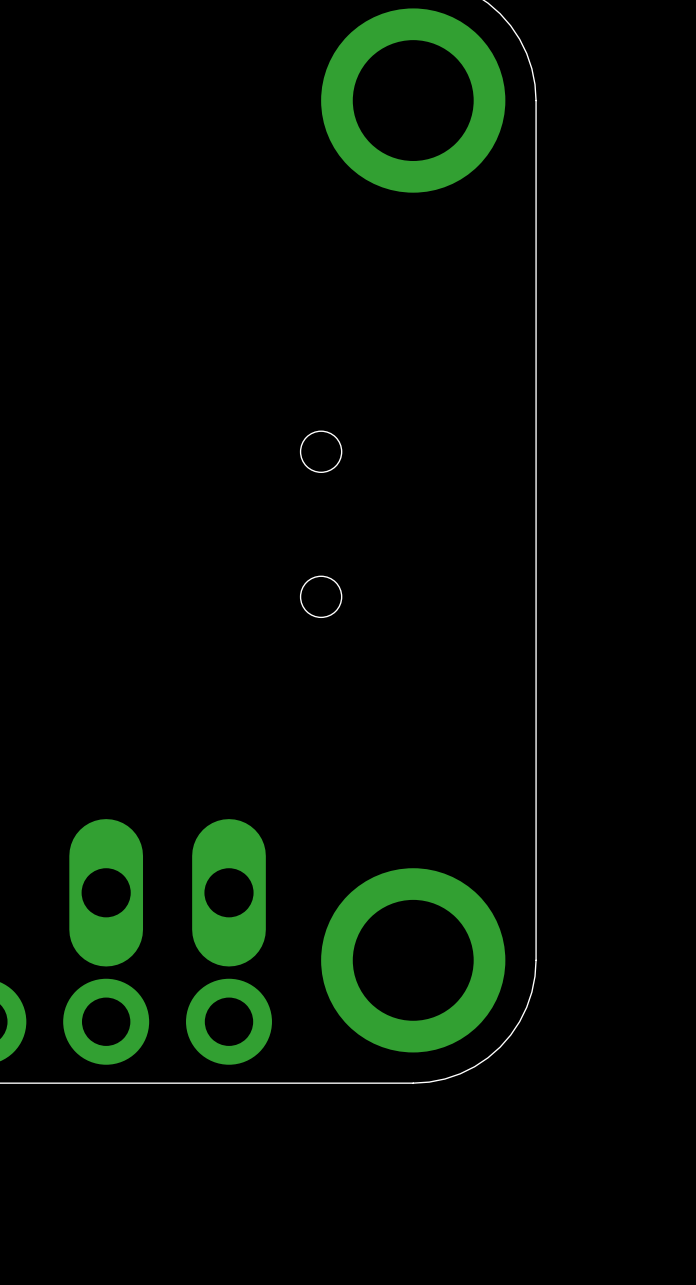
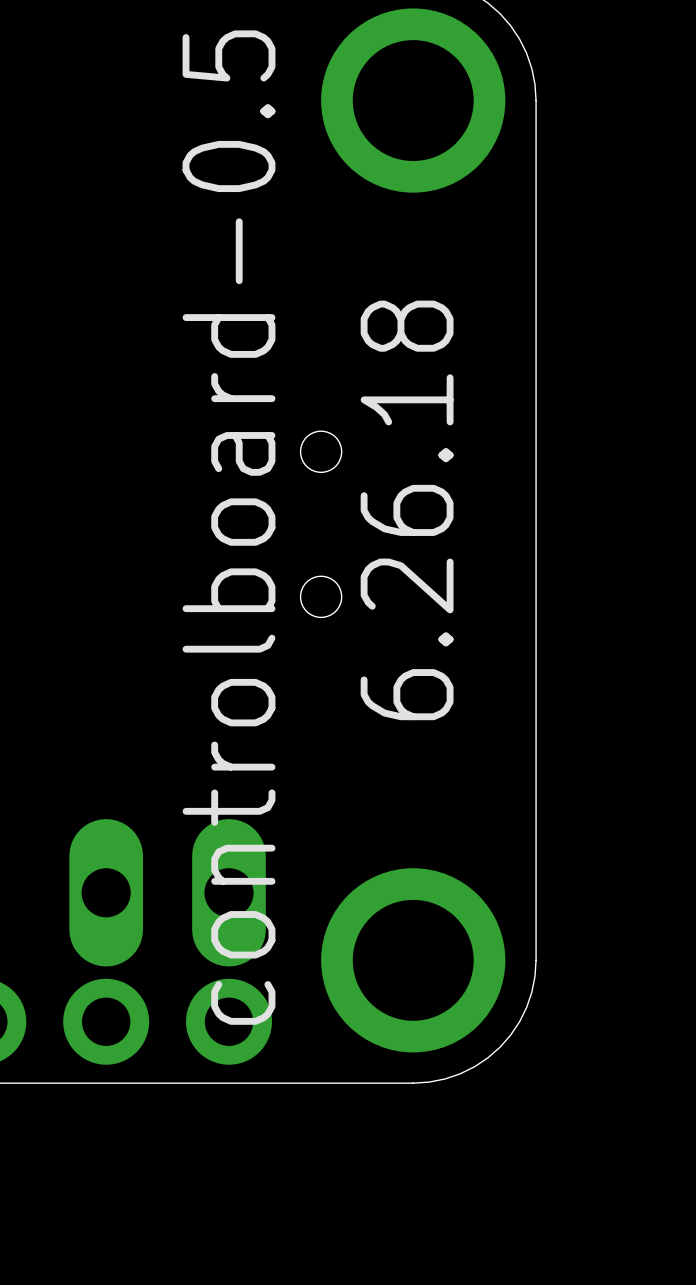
text: none -> 6.26.18 (407, 510)
text: none -> controlboard-0.5 (228, 527)

